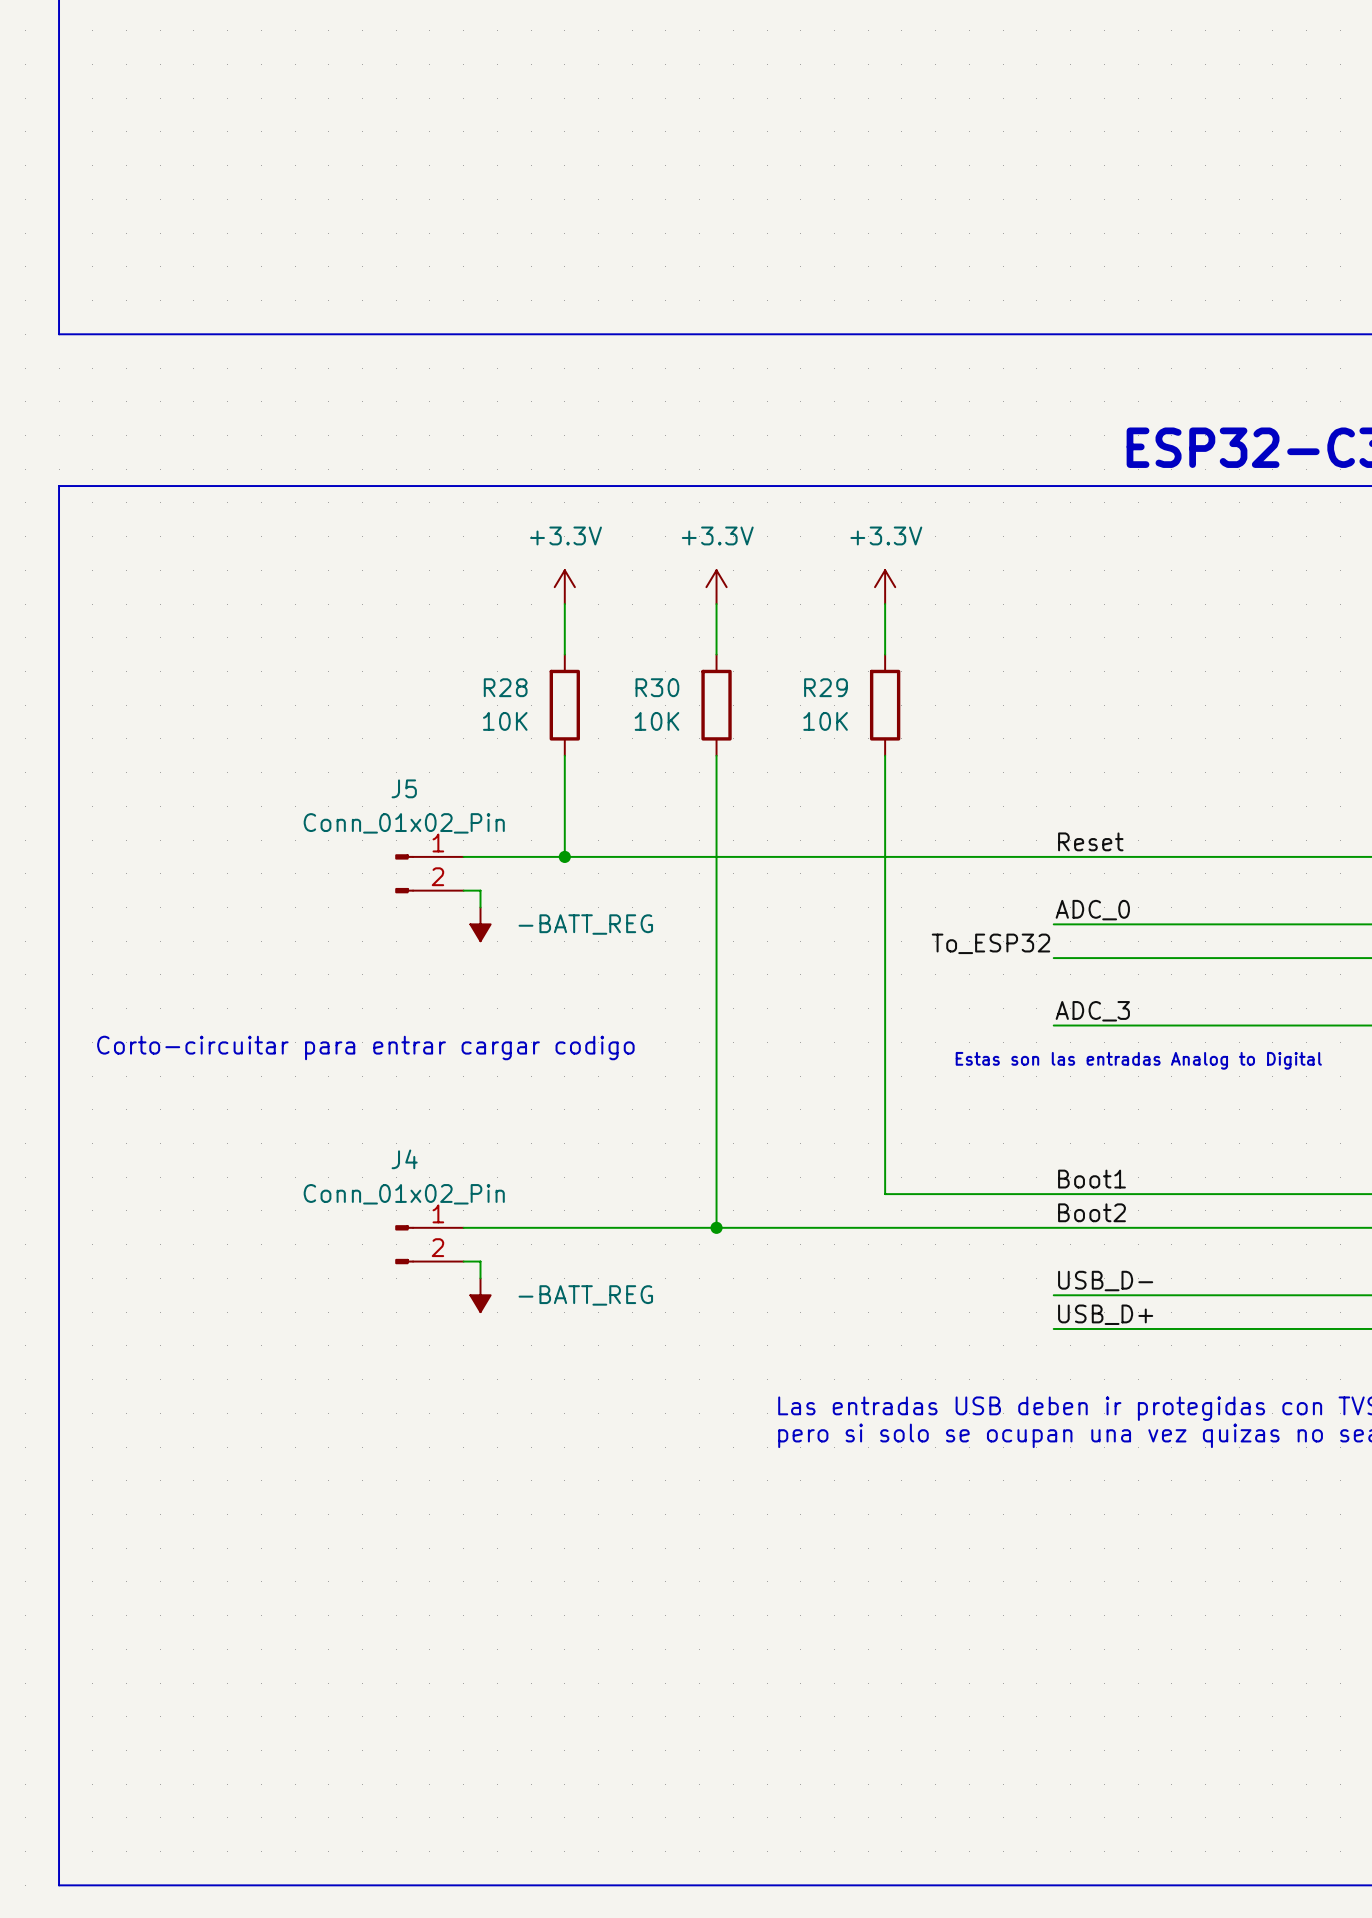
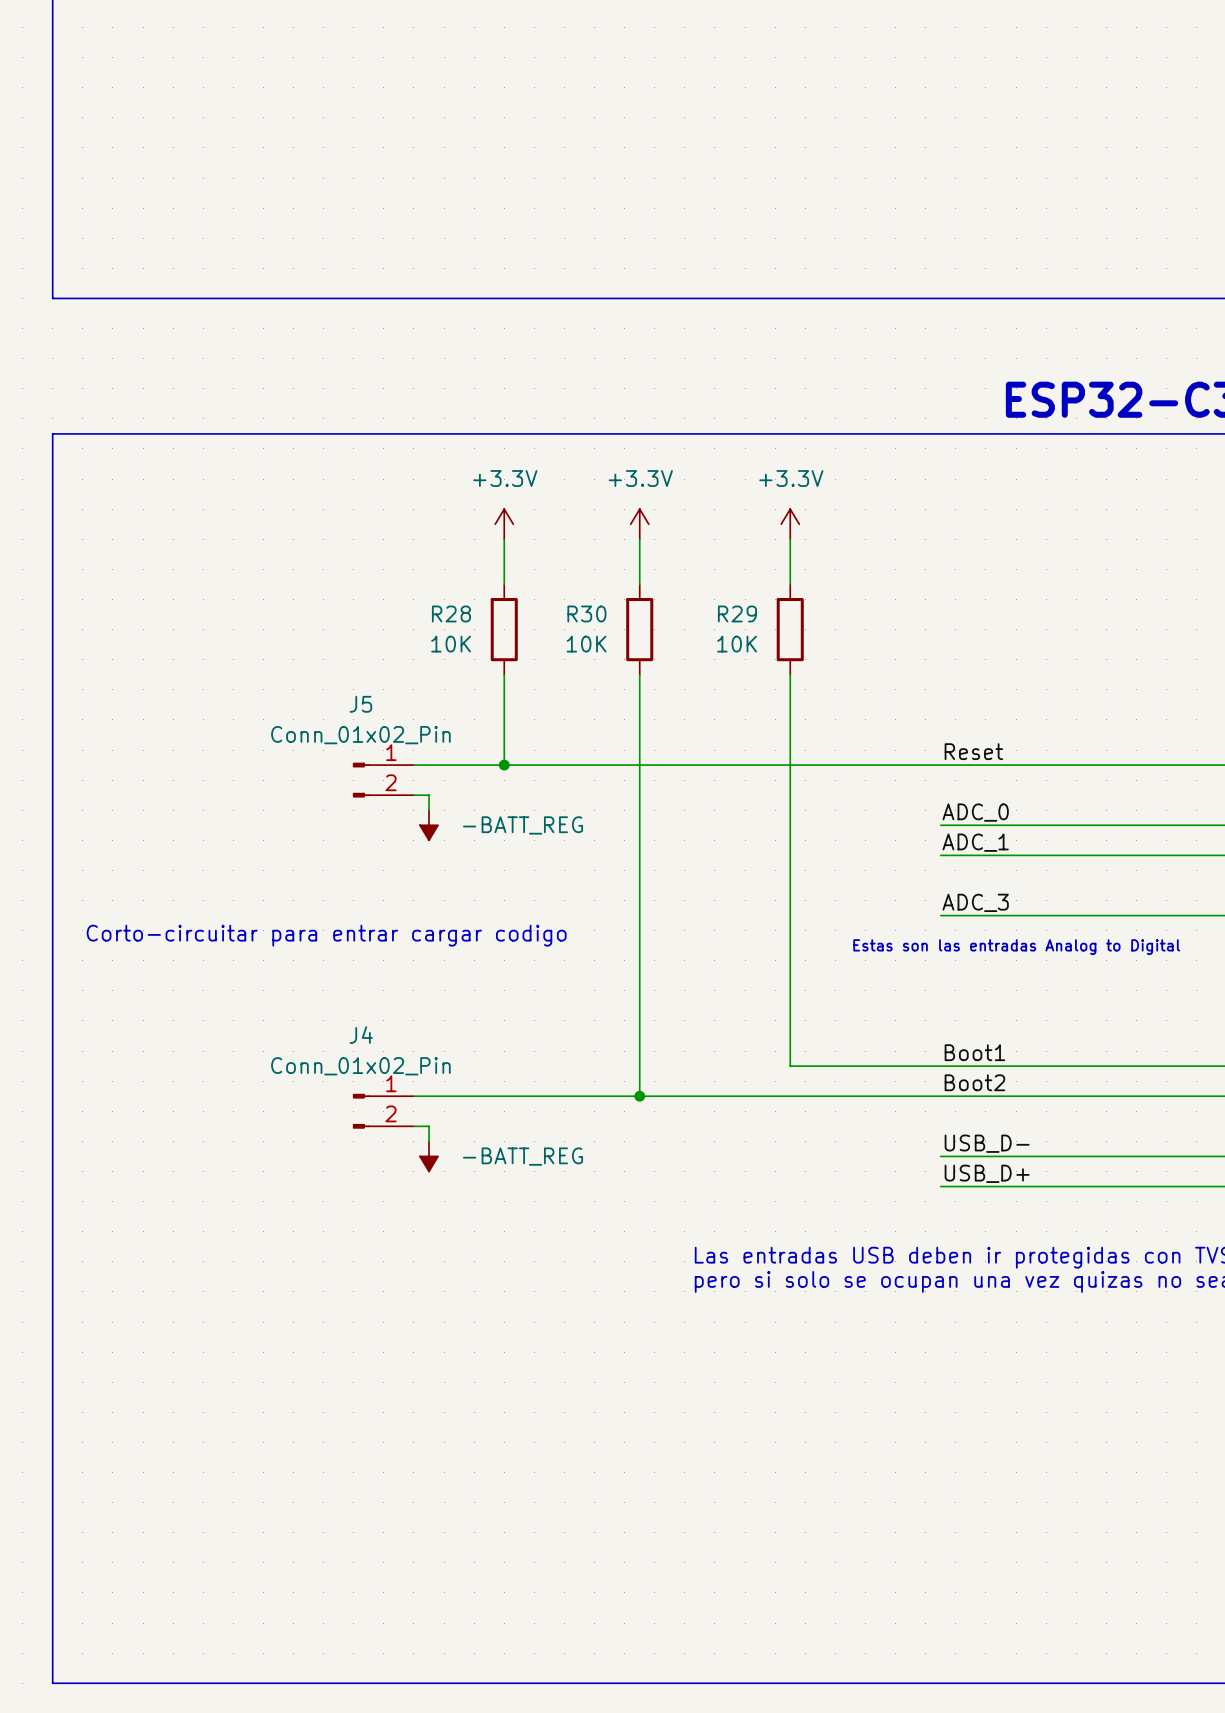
label: To_ESP32 (990, 943) -> ADC_1 (975, 842)

